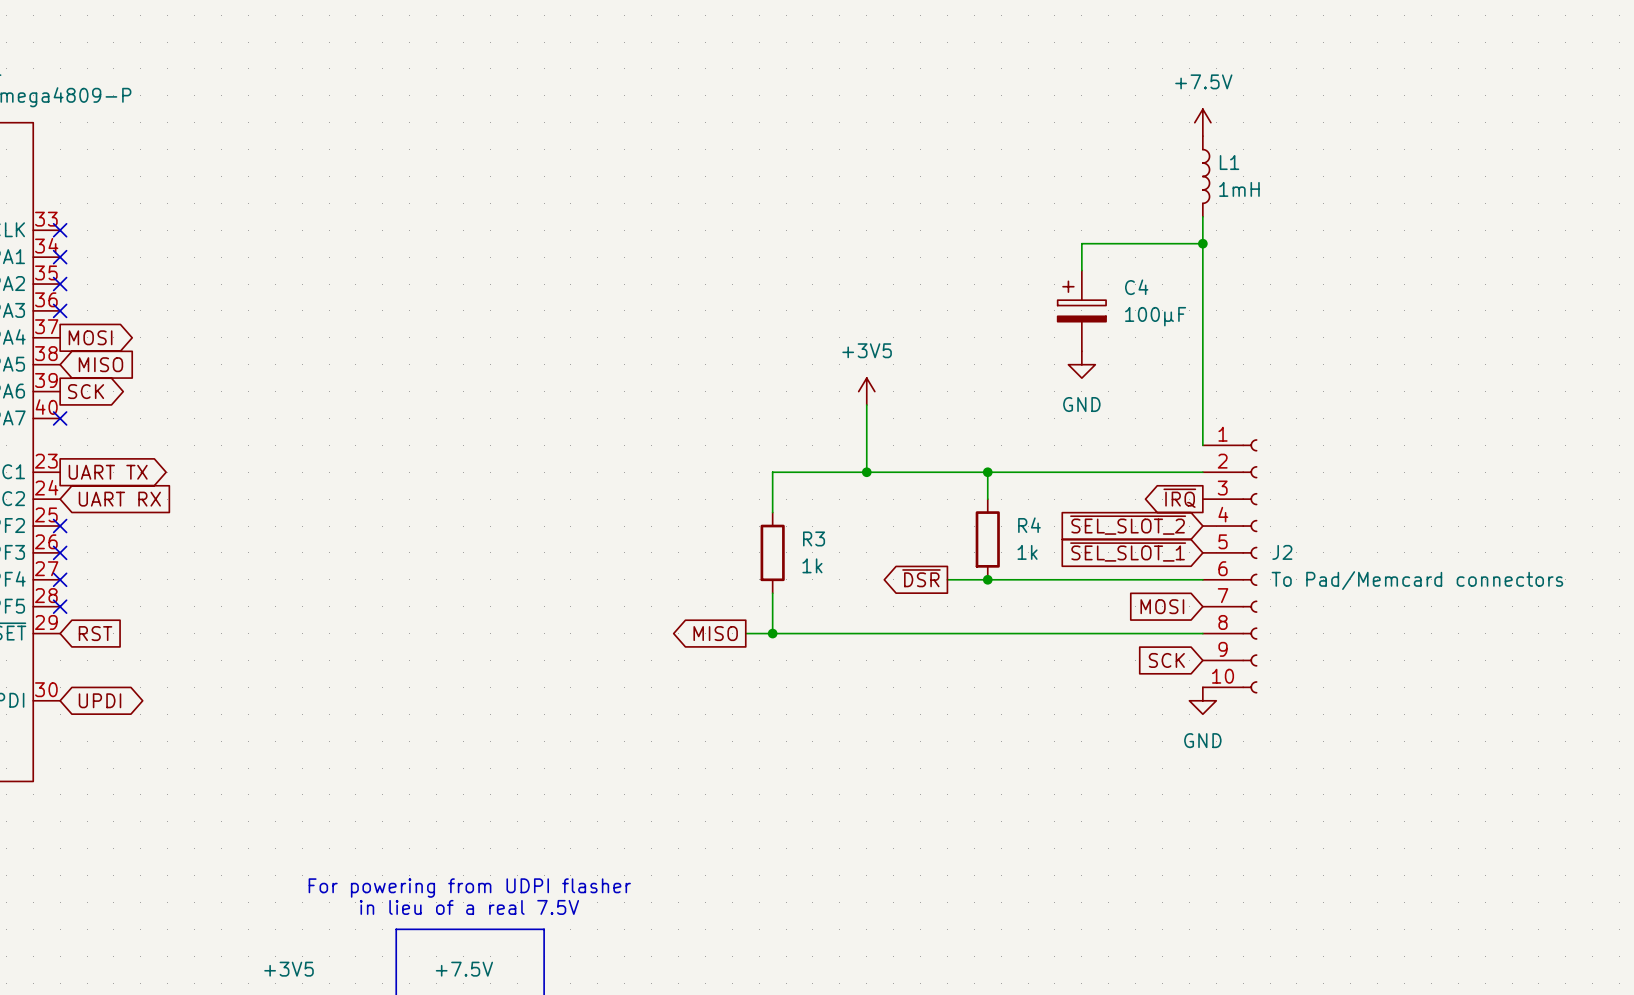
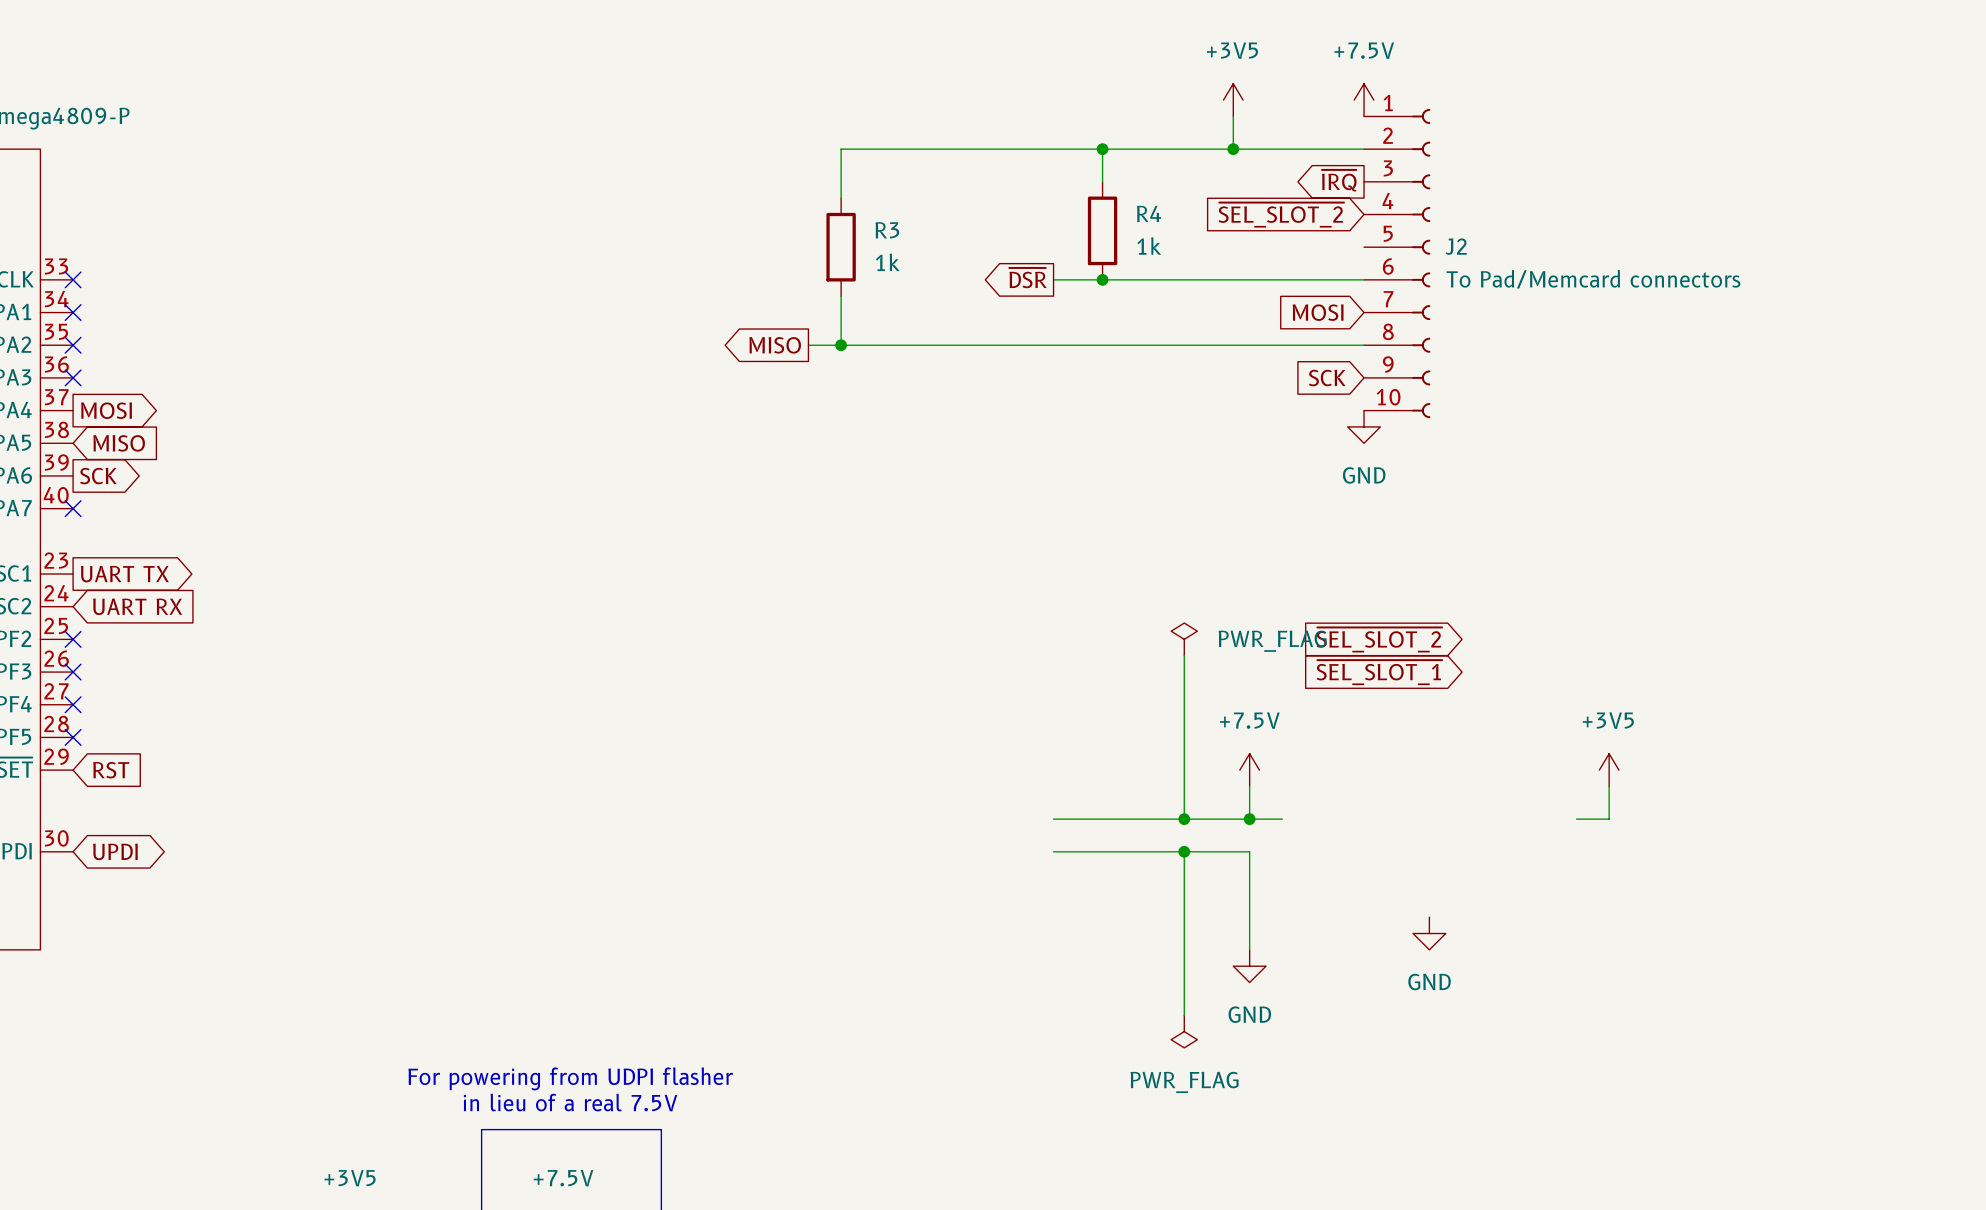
power symbol: none -> +3V5 (1233, 100)
wire: none -> (1233, 116) (1233, 149)
wire: none -> (1102, 149) (1102, 181)
junction: none -> (1102, 149)
junction: none -> (1233, 149)
wire: none -> (1364, 149) (841, 149) (841, 198)
power symbol position: +7.5V (1202, 122) -> +7.5V (1364, 100)
global label: none -> ~{IRQ} (1339, 180)
global label: none -> ~{SEL_SLOT_2} (1281, 215)
L1: 1mH (1206, 176) -> none
wire: (1202, 216) (1202, 445) -> none
global label: none -> ~{DSR} (1027, 278)
wire: none -> (1053, 279) (1364, 279)
junction: none -> (1102, 279)
wire: none -> (841, 296) (841, 345)
wire: (1202, 243) (1081, 243) (1081, 270) -> none
junction: (1202, 243) -> none
global label: none -> MOSI (1318, 312)
global label: none -> MISO (775, 345)
wire: none -> (808, 345) (1364, 345)
junction: none -> (841, 345)
C4: 100µF (1081, 310) -> none
global label: none -> SCK (1327, 378)
power symbol position: GND (1081, 364) -> GND (1364, 426)
power symbol: +3V5 (866, 391) -> none
wire: (866, 405) (866, 472) -> none
junction: (866, 472) -> none
wire: (987, 472) (987, 499) -> (1249, 786) (1249, 819)
junction: (987, 472) -> none
wire: (1202, 472) (772, 472) (772, 512) -> none
global label: ~{IRQ} (1179, 498) -> none
power symbol: none -> PWR_FLAG (1184, 639)
wire: none -> (1184, 655) (1184, 819)
R4 position: (987, 539) -> (1102, 230)
R3 position: (772, 552) -> (841, 247)
J2 position: (1230, 566) -> (1397, 263)
global label: ~{DSR} (921, 578) -> none
wire: (947, 579) (1202, 579) -> none
junction: (987, 579) -> none
wire: (772, 593) (772, 633) -> none
global label: MOSI (1162, 606) -> none
global label: MISO (715, 633) -> none
wire: (745, 633) (1202, 633) -> none
junction: (772, 633) -> none
power symbol: none -> +7.5V (1249, 770)
power symbol: none -> +3V5 (1609, 770)
wire: none -> (1609, 786) (1609, 819) (1576, 819)
global label: SCK (1166, 660) -> none
wire: none -> (1053, 819) (1282, 819)
junction: none -> (1184, 819)
junction: none -> (1249, 819)
wire: none -> (1053, 851) (1249, 851) (1249, 949)
wire: none -> (1184, 851) (1184, 1015)
junction: none -> (1184, 851)
power symbol position: GND (1202, 700) -> GND (1429, 933)
power symbol: none -> GND (1249, 966)
power symbol: none -> PWR_FLAG (1184, 1031)

